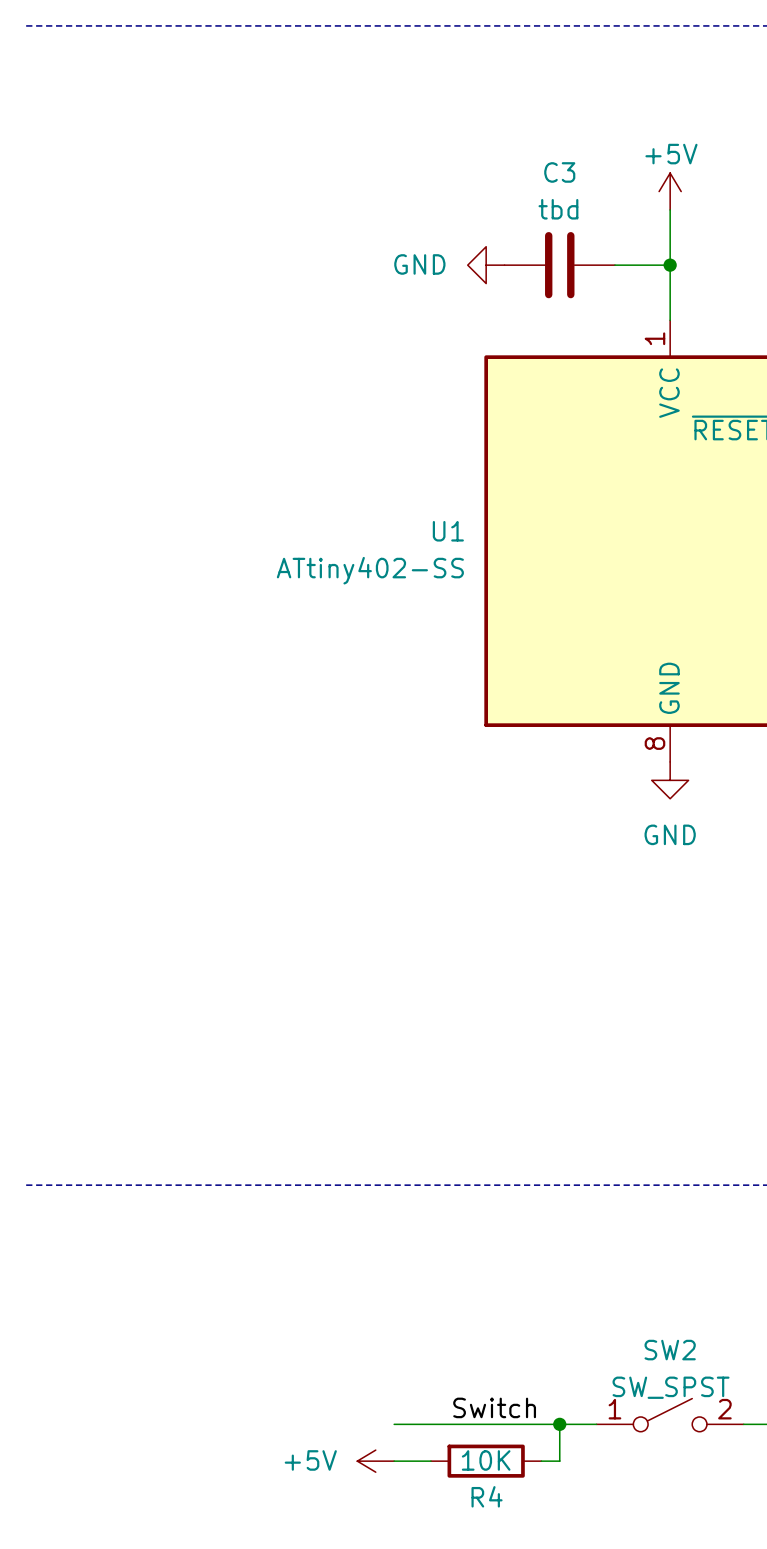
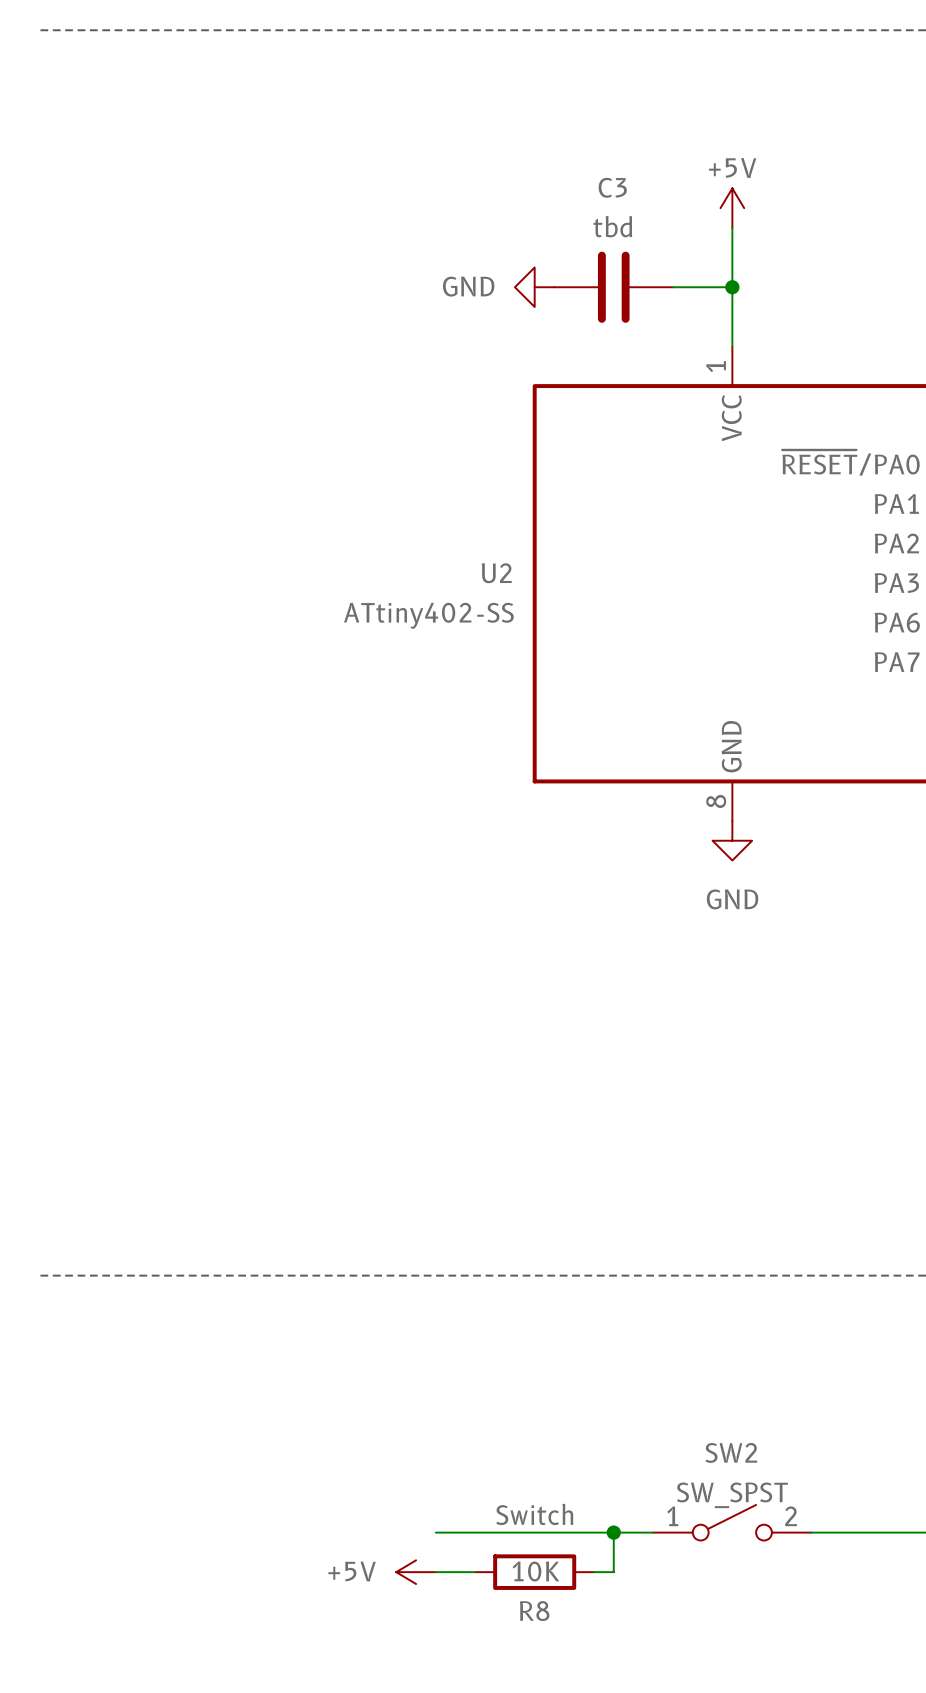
U1 name: U1 (448, 531) -> U2 (496, 573)
R4 name: R4 (487, 1496) -> R8 (534, 1611)

